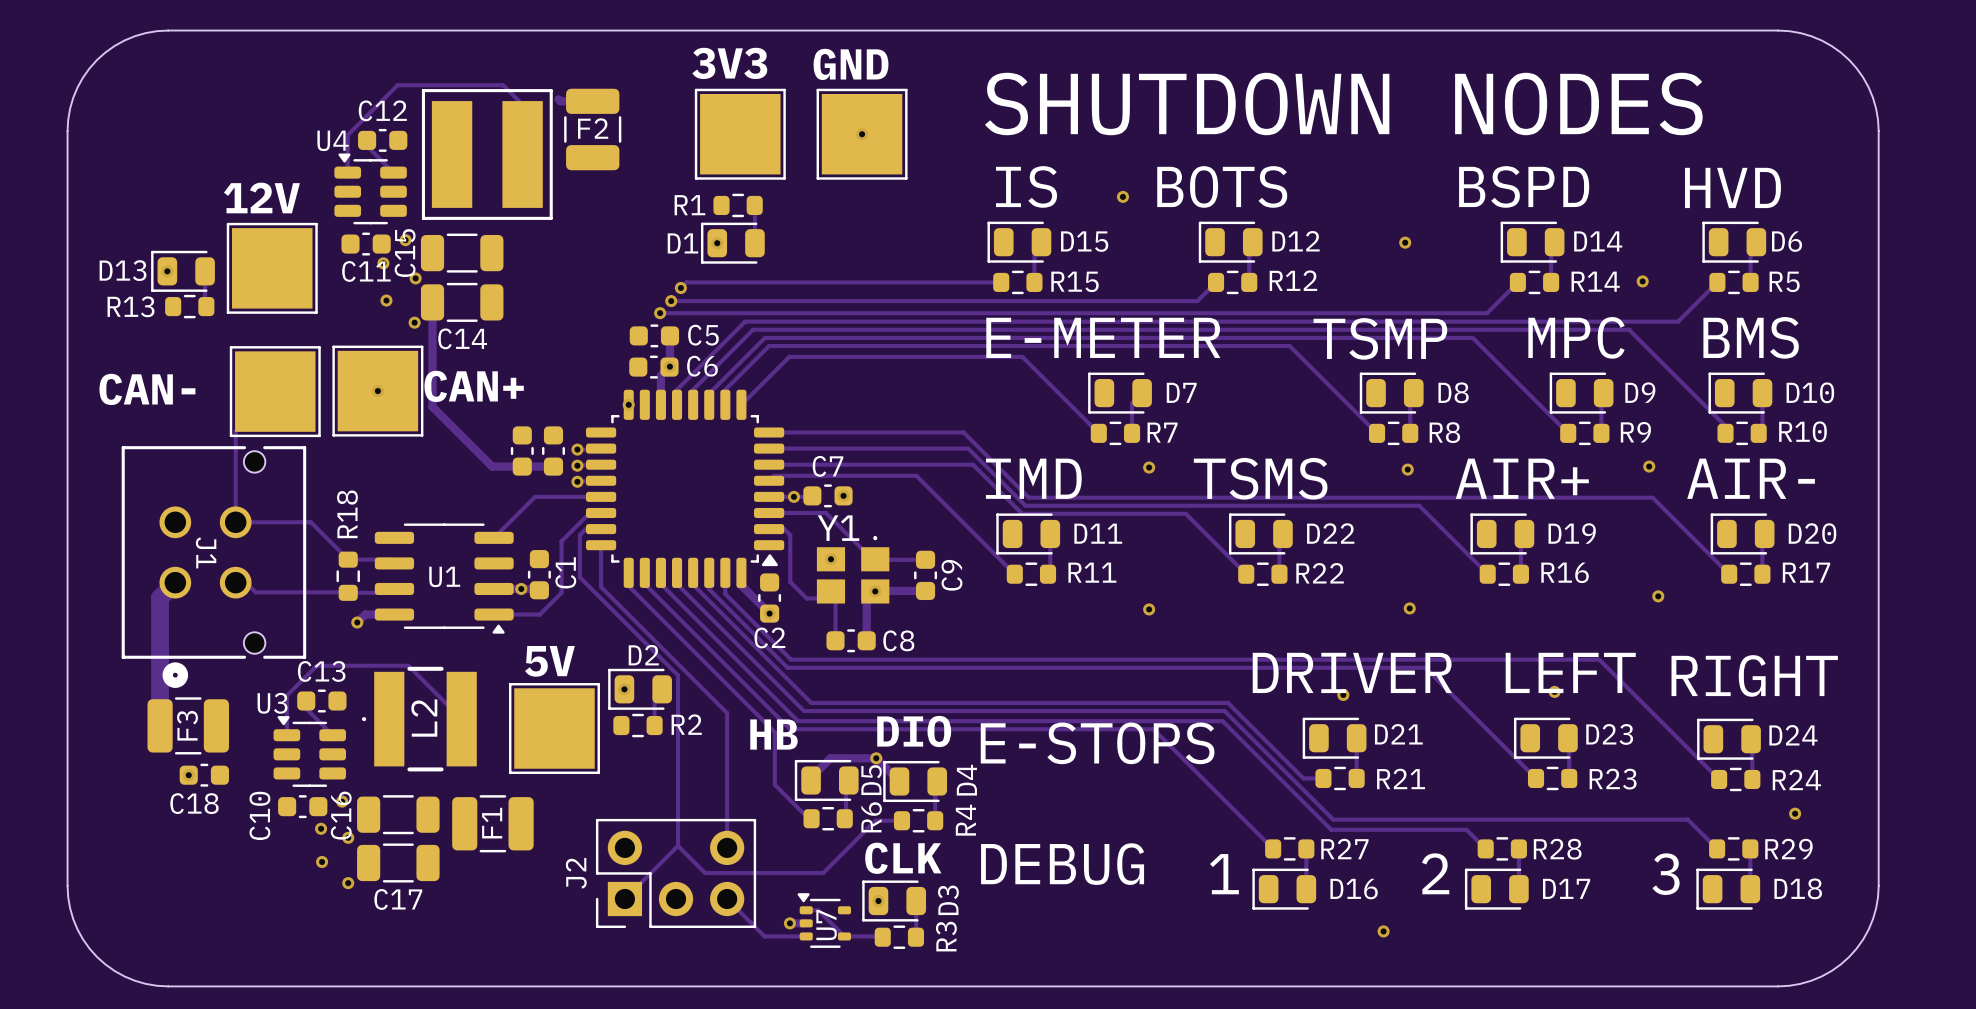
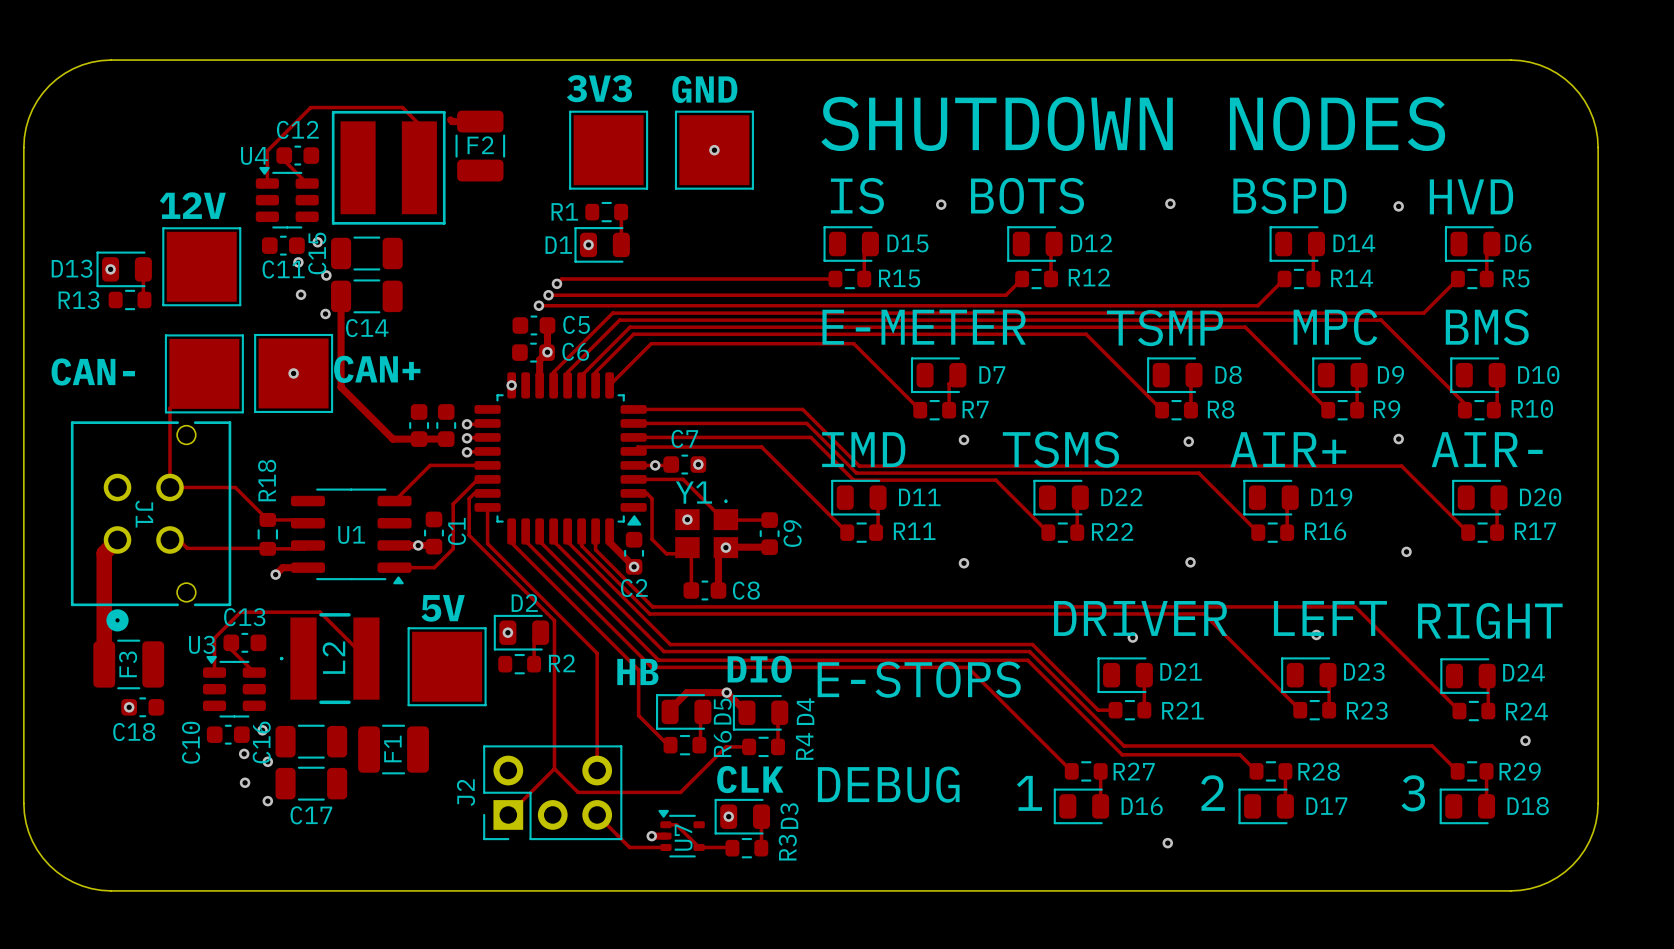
via position: (1405, 242) -> (1170, 203)
via position: (1642, 281) -> (1398, 206)

